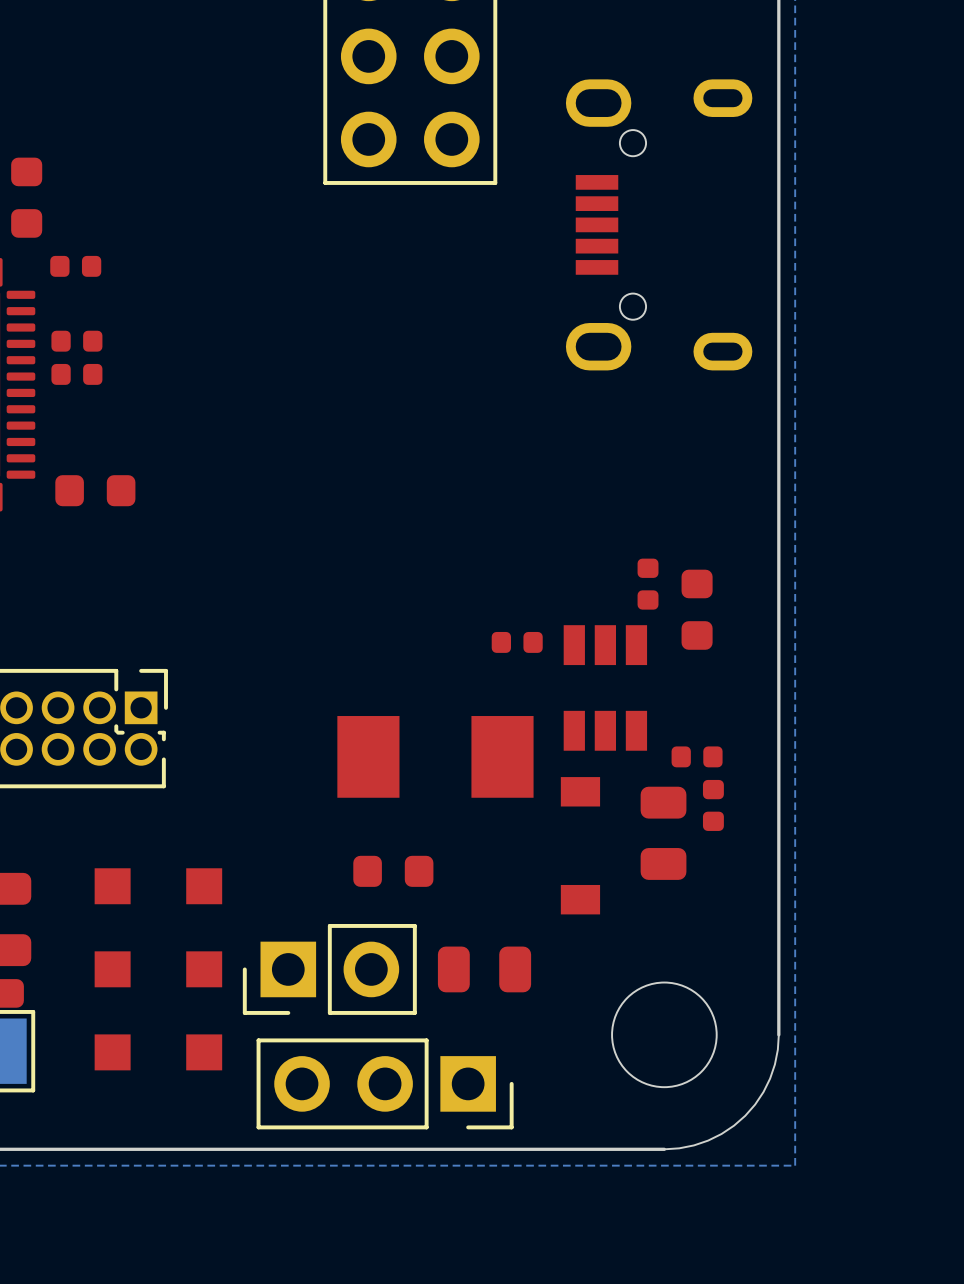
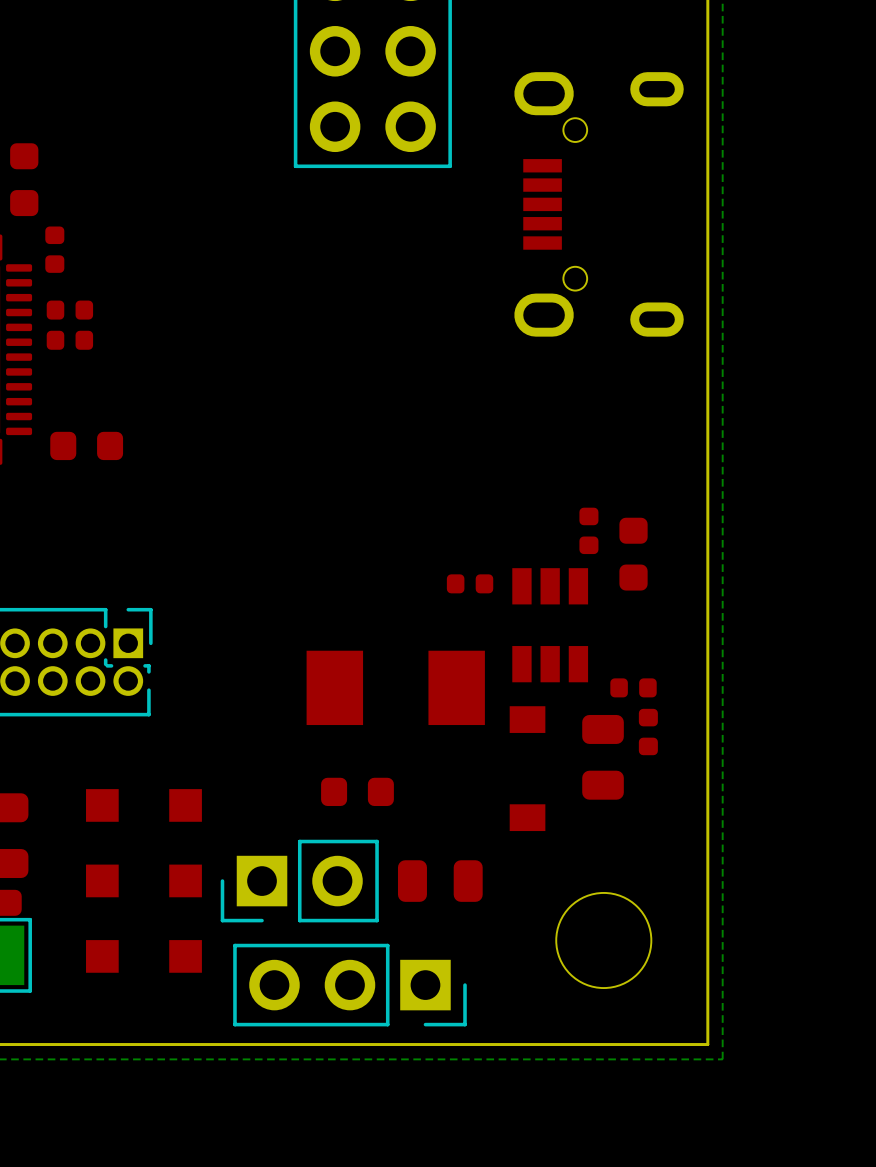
part rotation: 0° (75, 266) -> 90° clockwise (54, 249)
board edge: (778, 1034) (774, 1064) (770, 1078) (763, 1092) (745, 1115) (734, 1125) (708, 1140) (693, 1145) (664, 1149) -> (707, 940) (707, 1044) (603, 1044)

